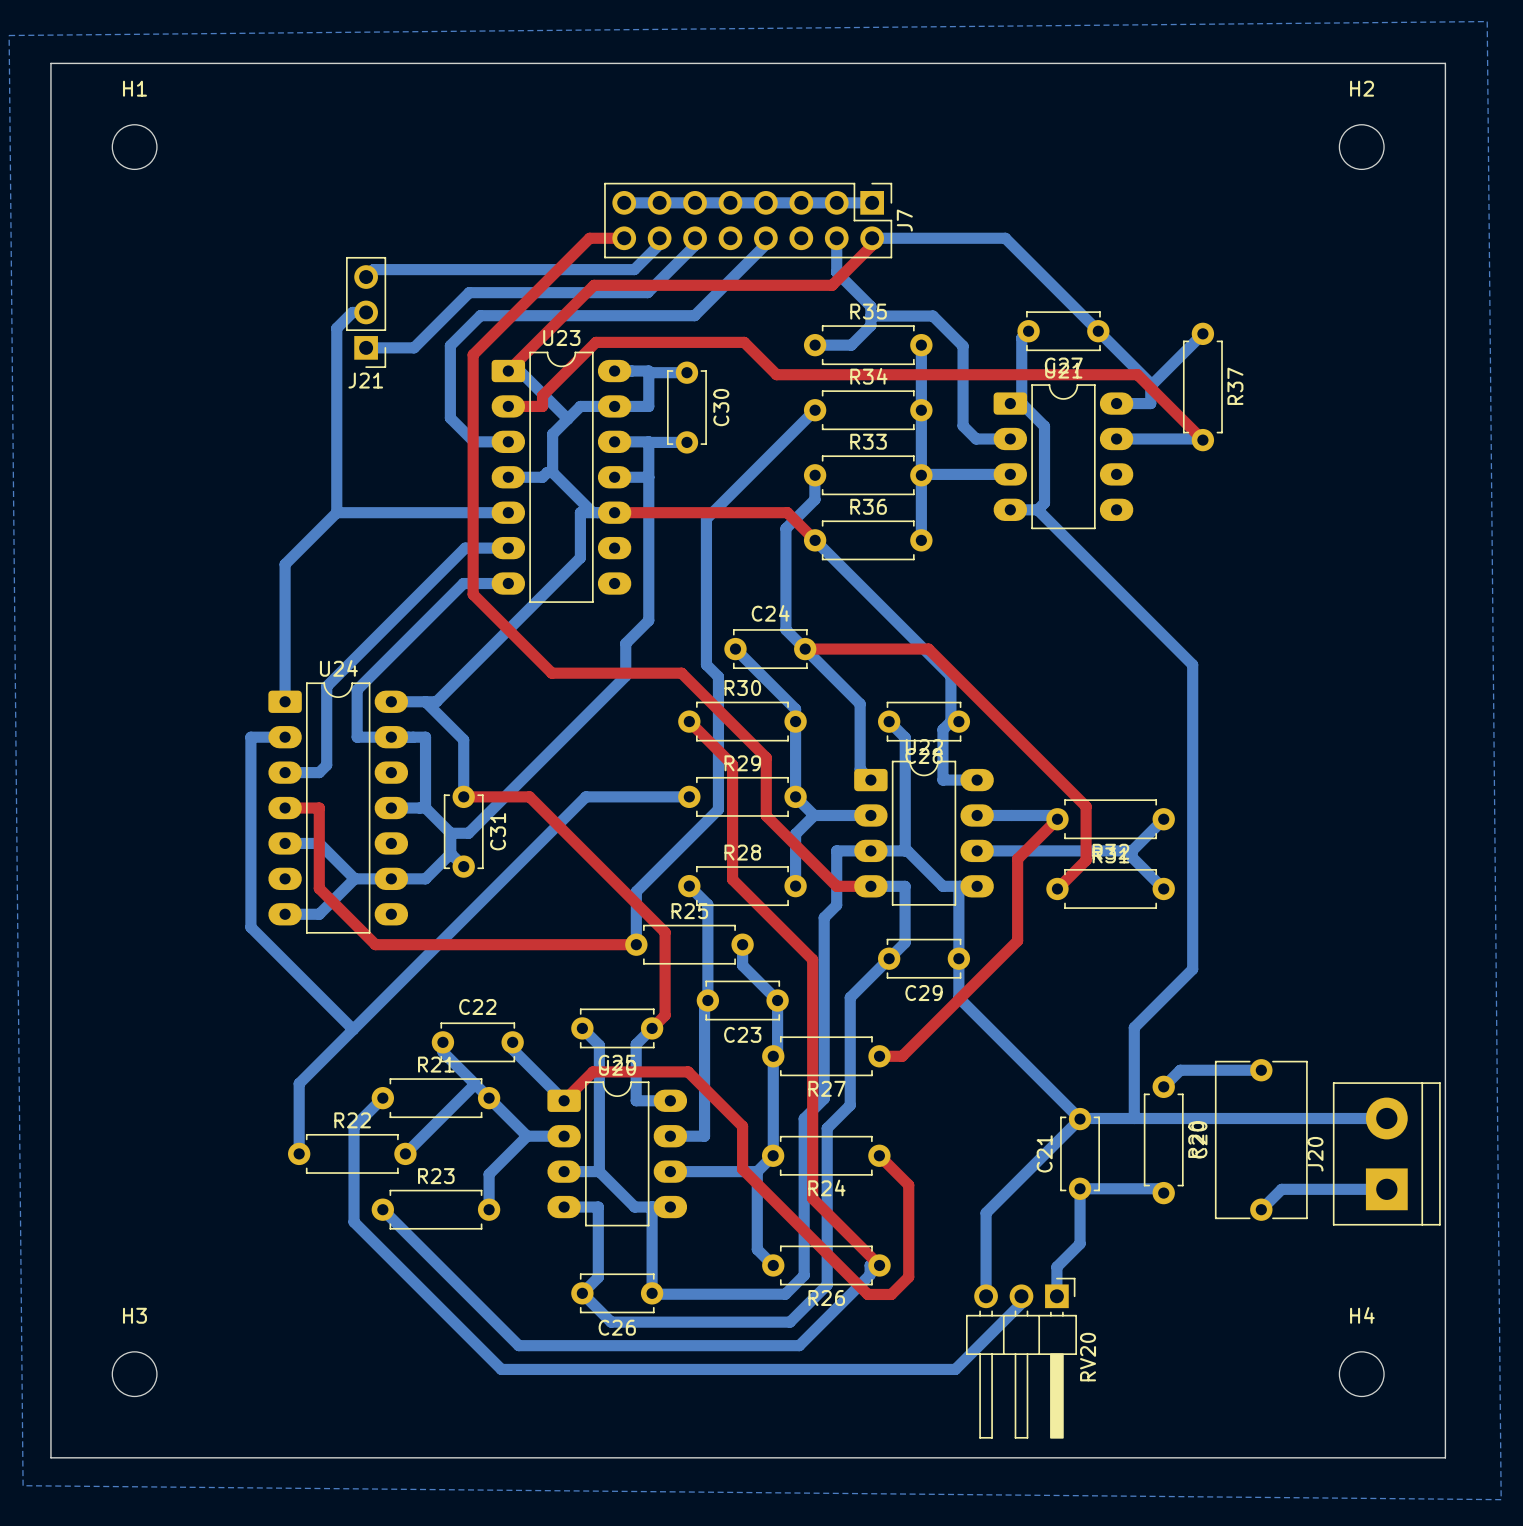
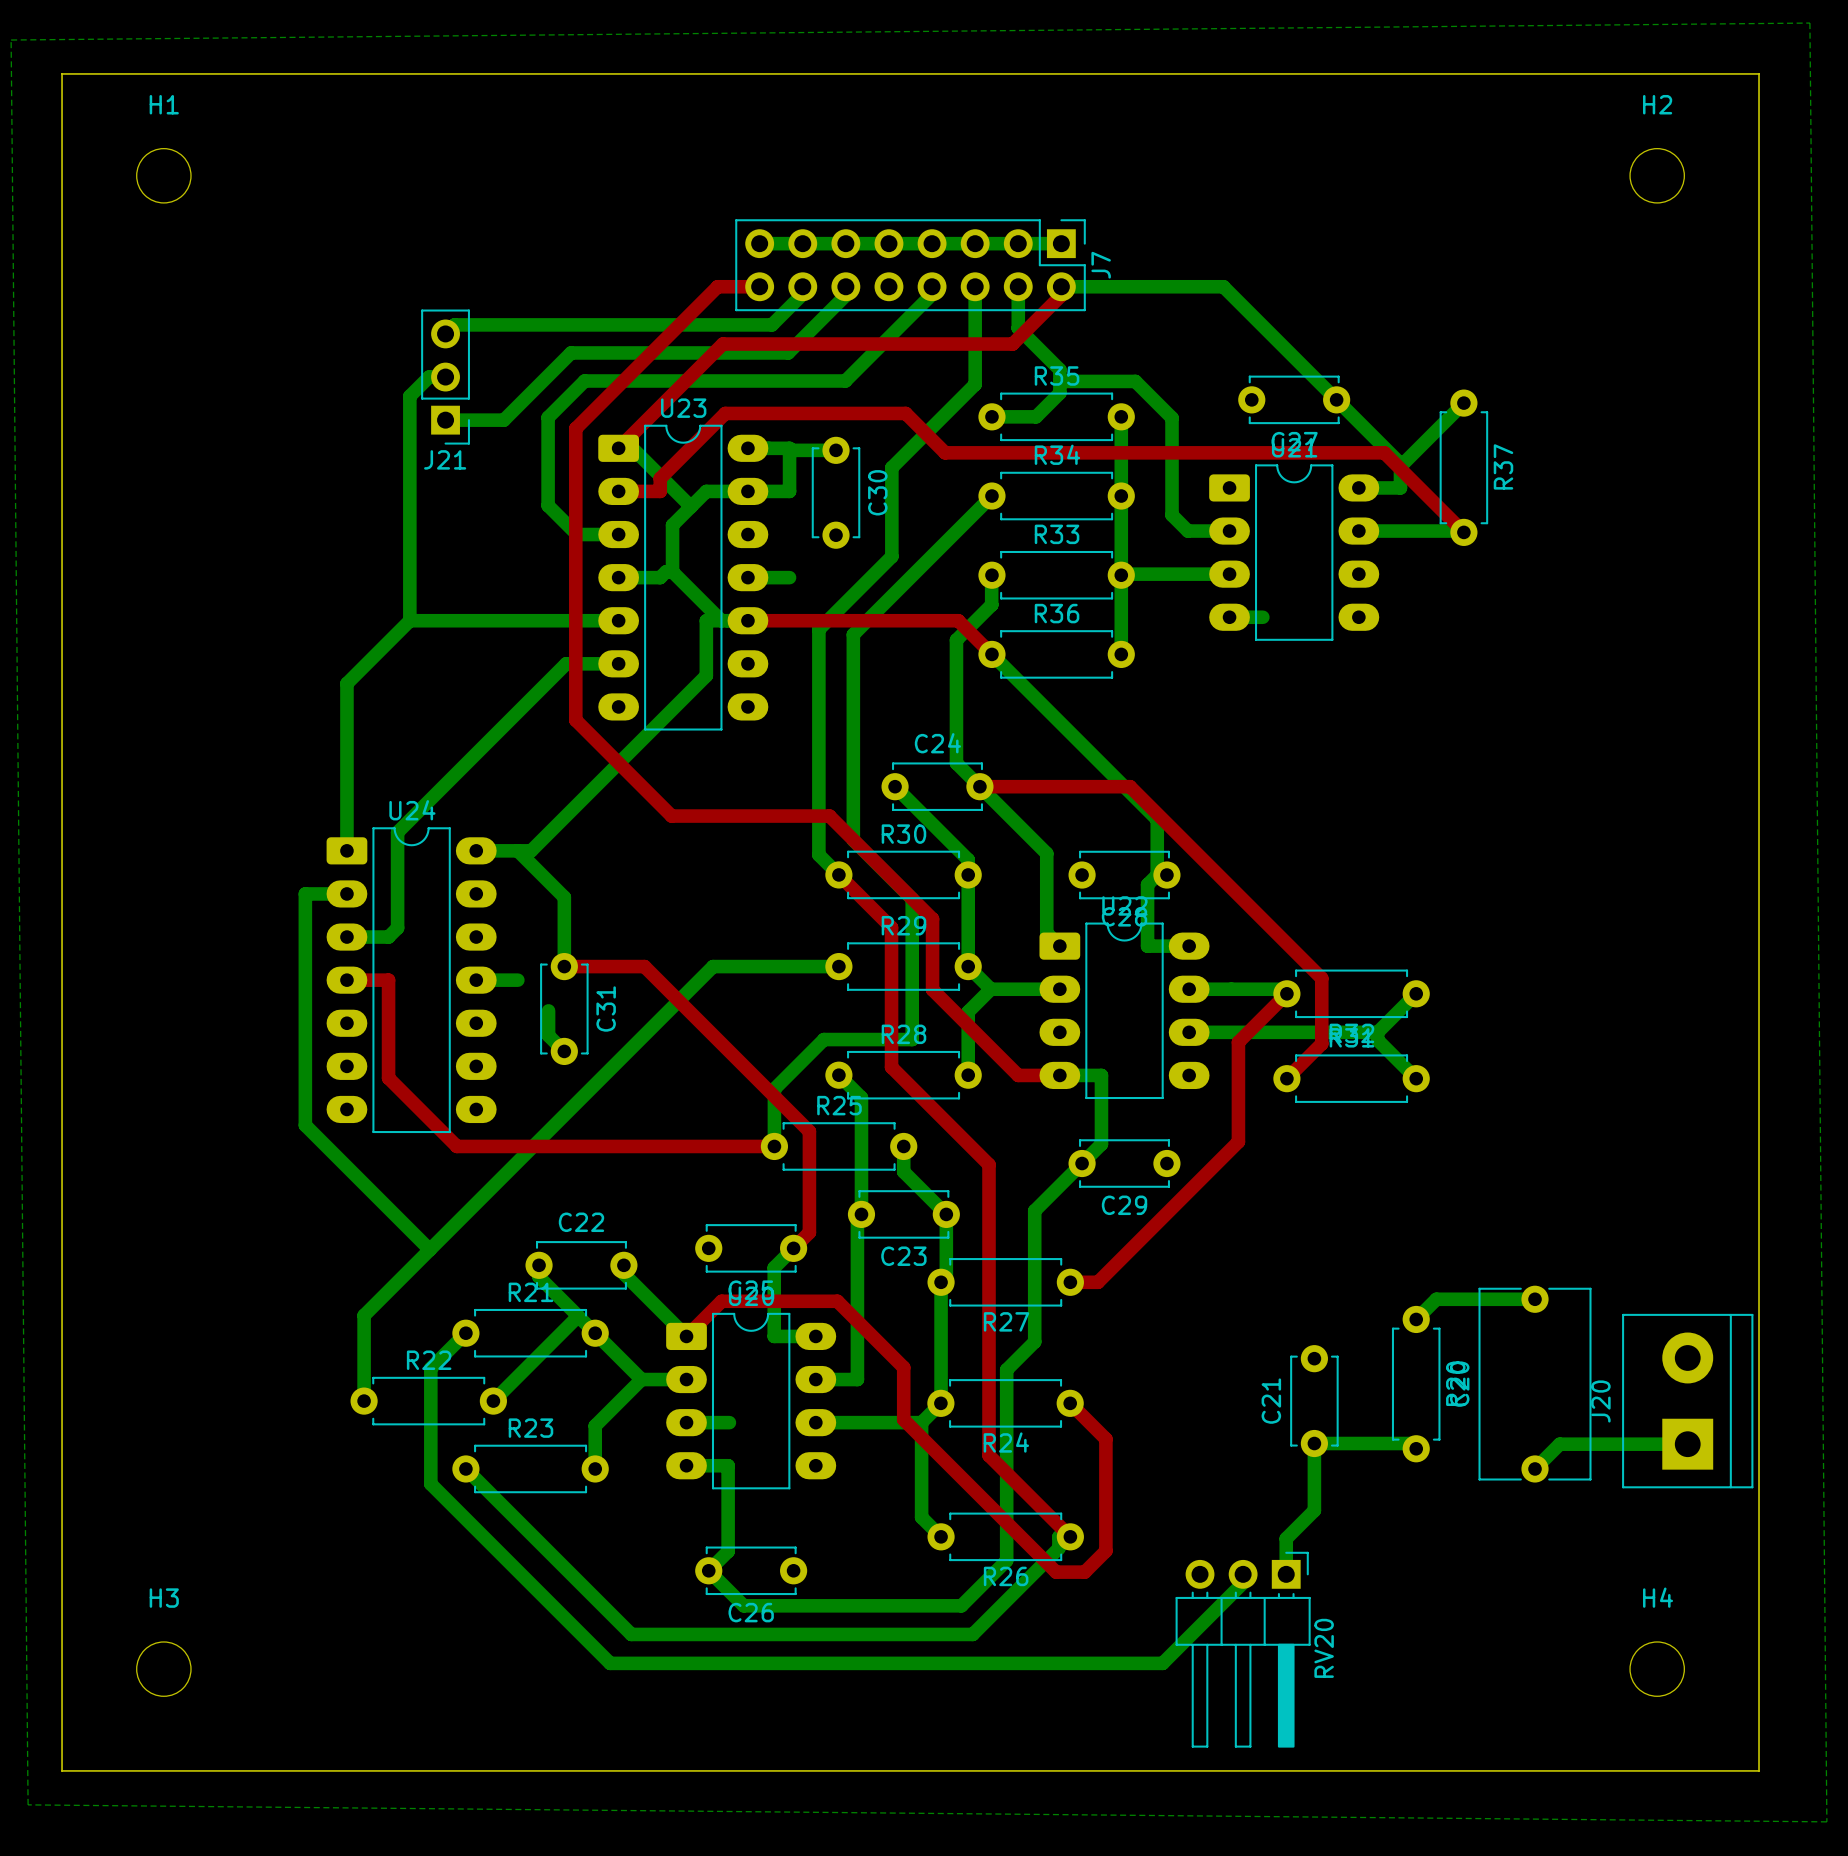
bottom track: none -> (975, 286) (975, 384) (891, 467) (891, 556) (818, 629) (818, 854) (838, 874)
bottom track: (1028, 331) (1021, 338) (1021, 403) -> none
bottom track: (1021, 403) (1044, 426) (1044, 503) (1037, 509) (1192, 664) (1192, 969) (1134, 1027) (1134, 1118) -> none
bottom track: (614, 441) (648, 441) (648, 620) (625, 643) (625, 676) (468, 833) (450, 833) (425, 808) (425, 737) (357, 737) (357, 689) (463, 583) (508, 583) -> none
bottom track: (648, 442) (686, 442) -> none
bottom track: (706, 518) (706, 664) (718, 676) (718, 809) (636, 891) (636, 897) -> (859, 628) (853, 634) (853, 840) (912, 899) (912, 1039) (823, 1039) (774, 1089)
bottom track: (889, 721) (905, 737) (905, 850) -> none
bottom track: (285, 843) (319, 843) (354, 878) -> none
bottom track: (450, 853) (425, 878) (354, 878) -> none
bottom track: (354, 878) (319, 914) (285, 914) -> none
bottom track: (960, 886) (958, 997) (1080, 1119) -> none
bottom track: (977, 886) (942, 886) (907, 850) (836, 850) (836, 905) (824, 917) (824, 1098) (804, 1118) (804, 1275) (785, 1294) (652, 1294) (652, 1207) -> none
bottom track: (582, 1028) (599, 1045) (599, 1171) (634, 1207) (670, 1207) -> none
bottom track: (1386, 1118) (1080, 1118) (986, 1213) (986, 1296) -> none

